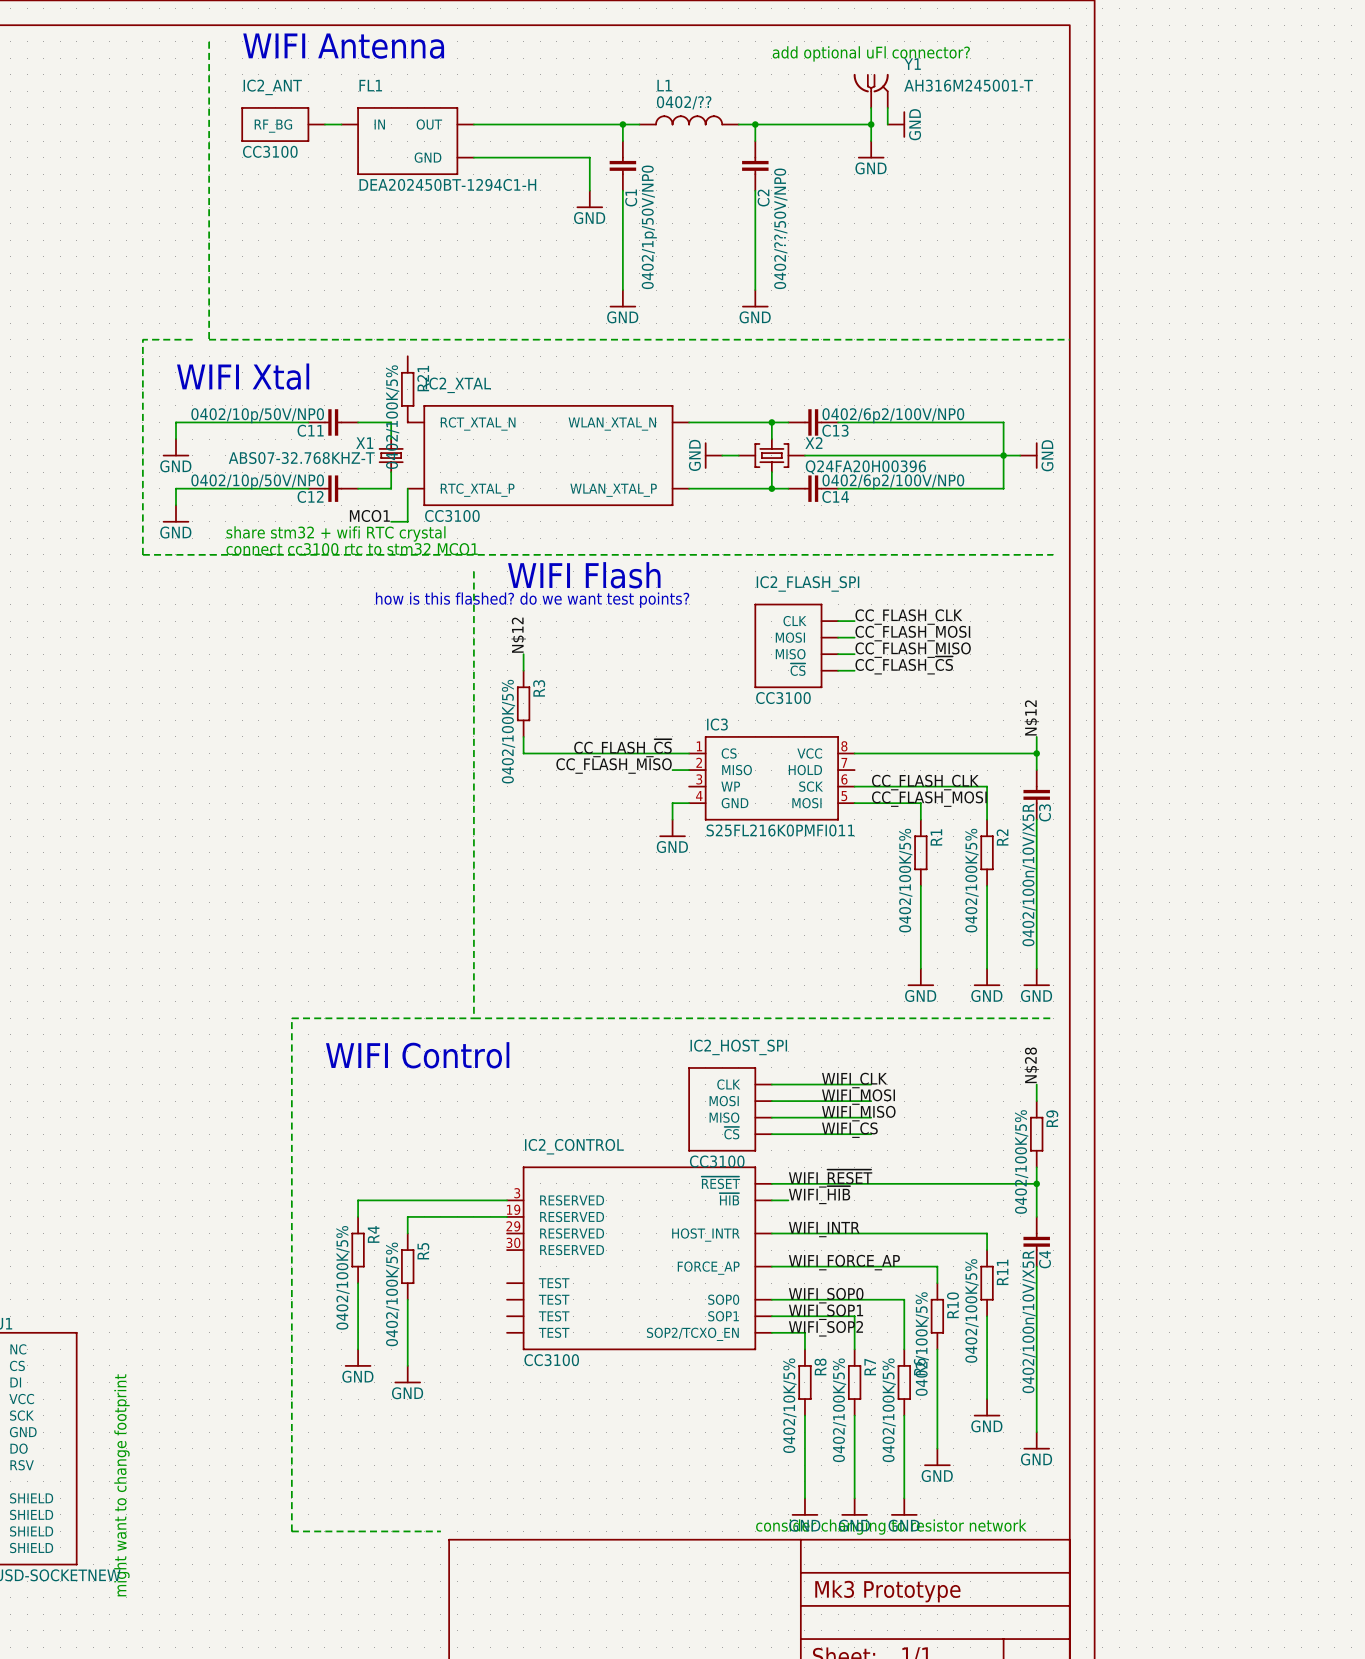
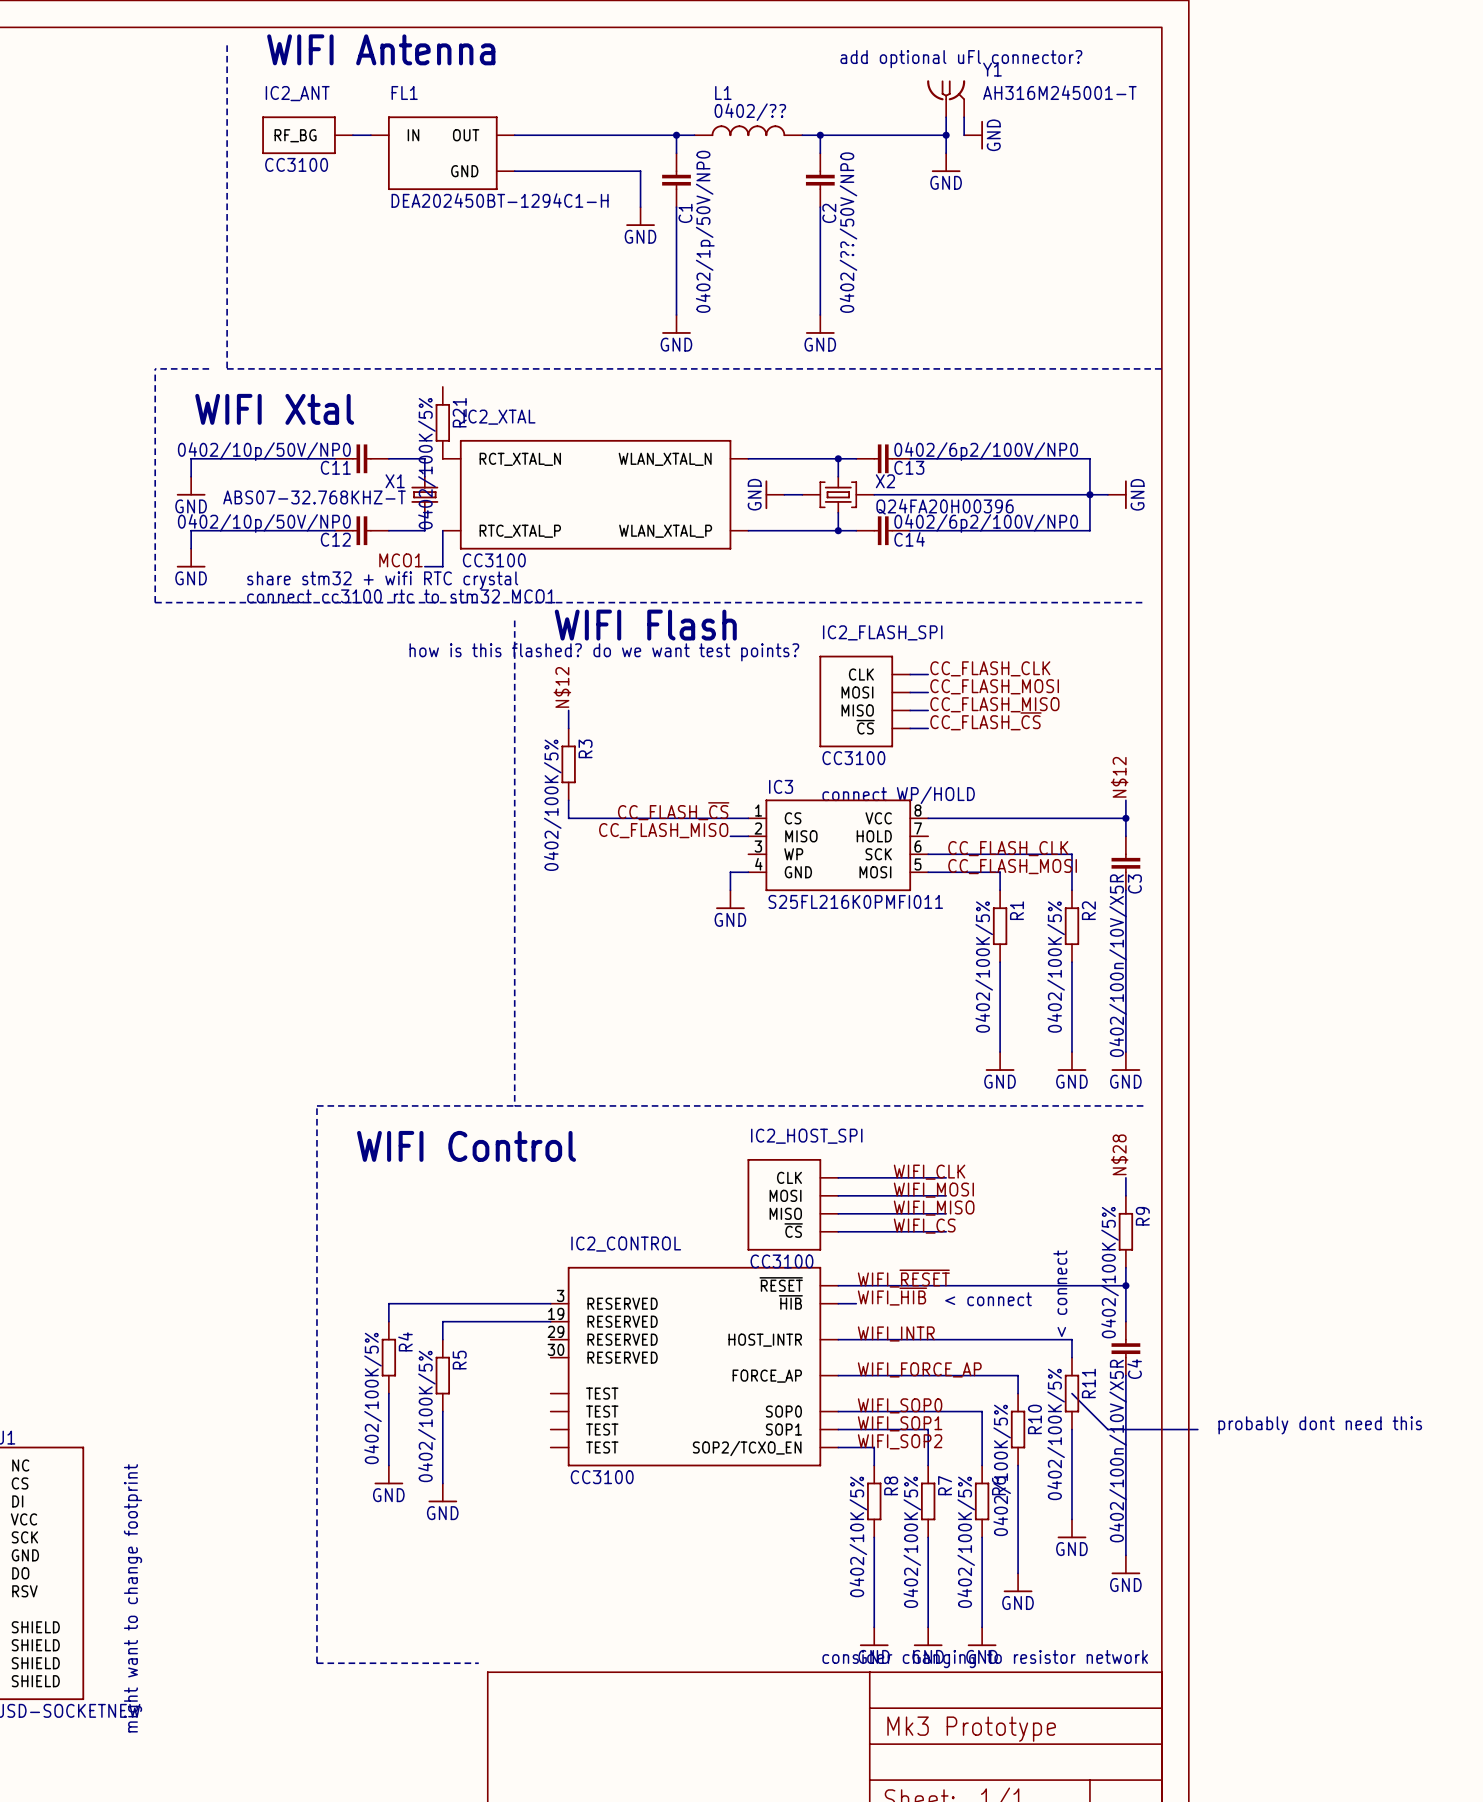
text: none -> connect WP/HOLD (898, 795)
text: none -> < connect (988, 1299)
text: none -> < connect (1060, 1293)
line: none -> (1071, 1393) (1107, 1429) (1197, 1429)
text: none -> probably dont need this (1320, 1425)

